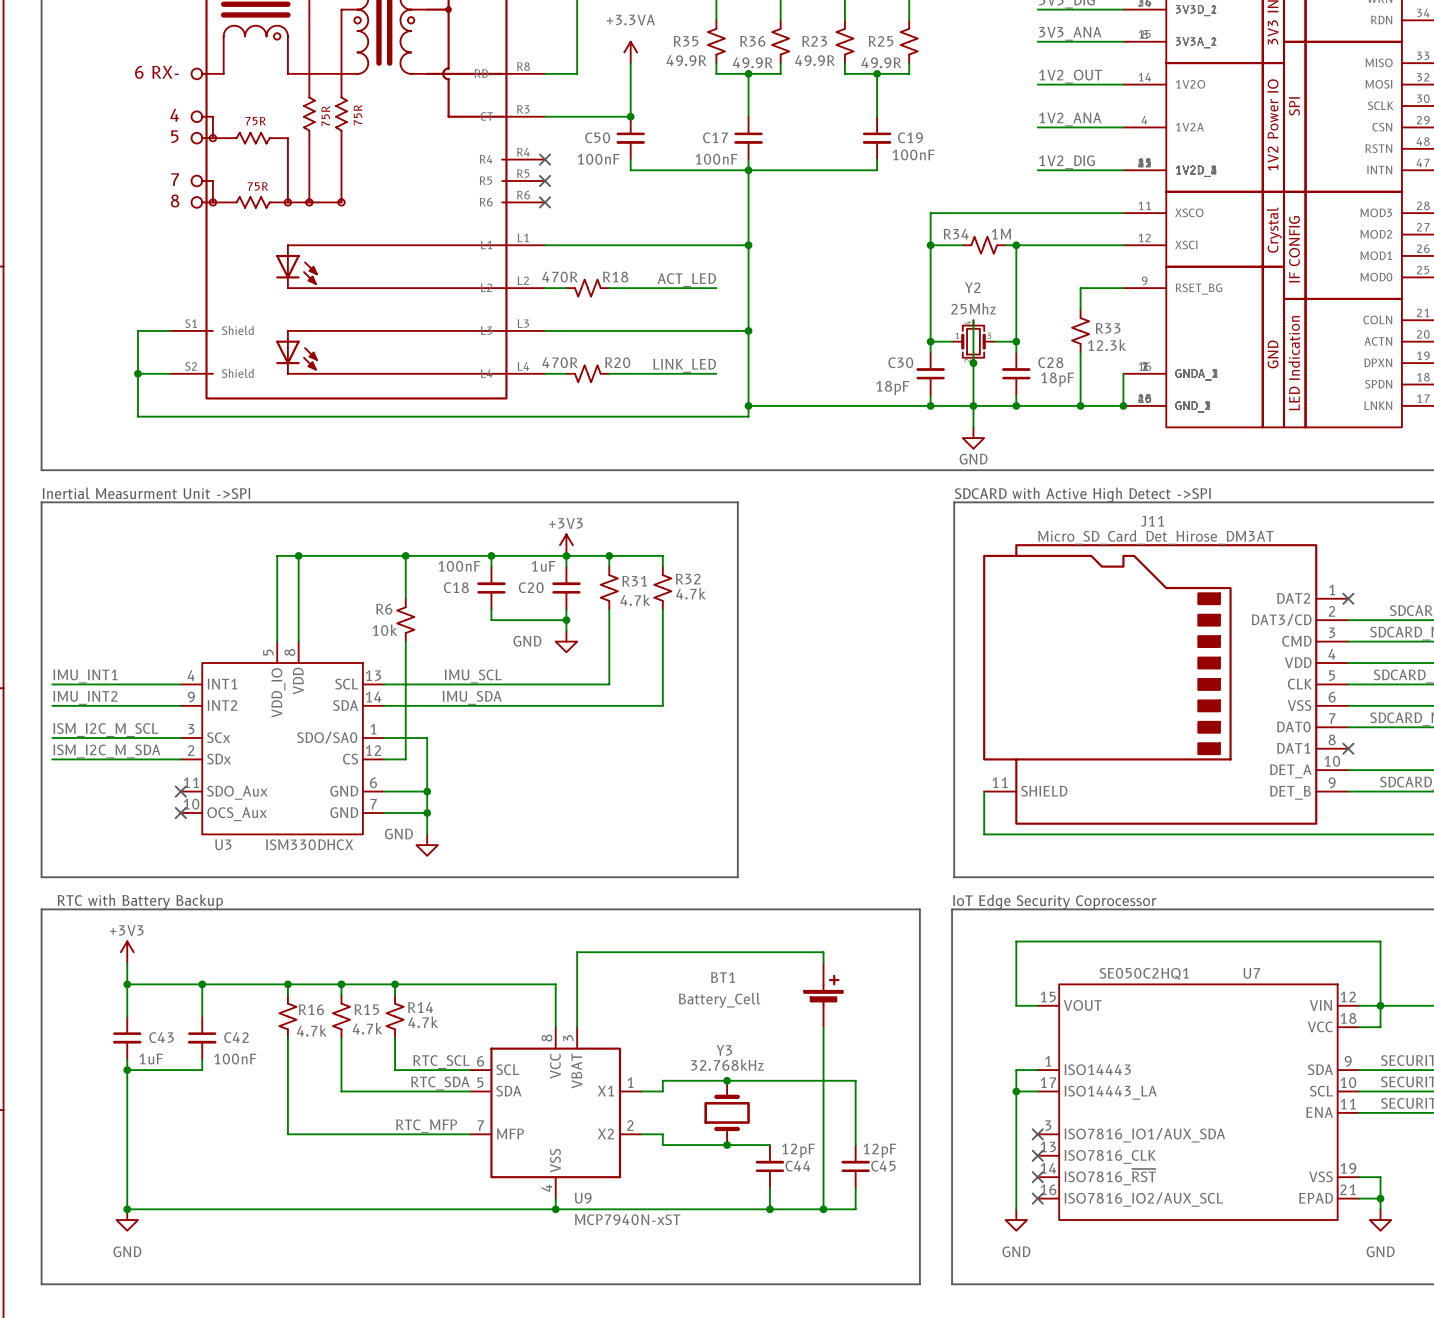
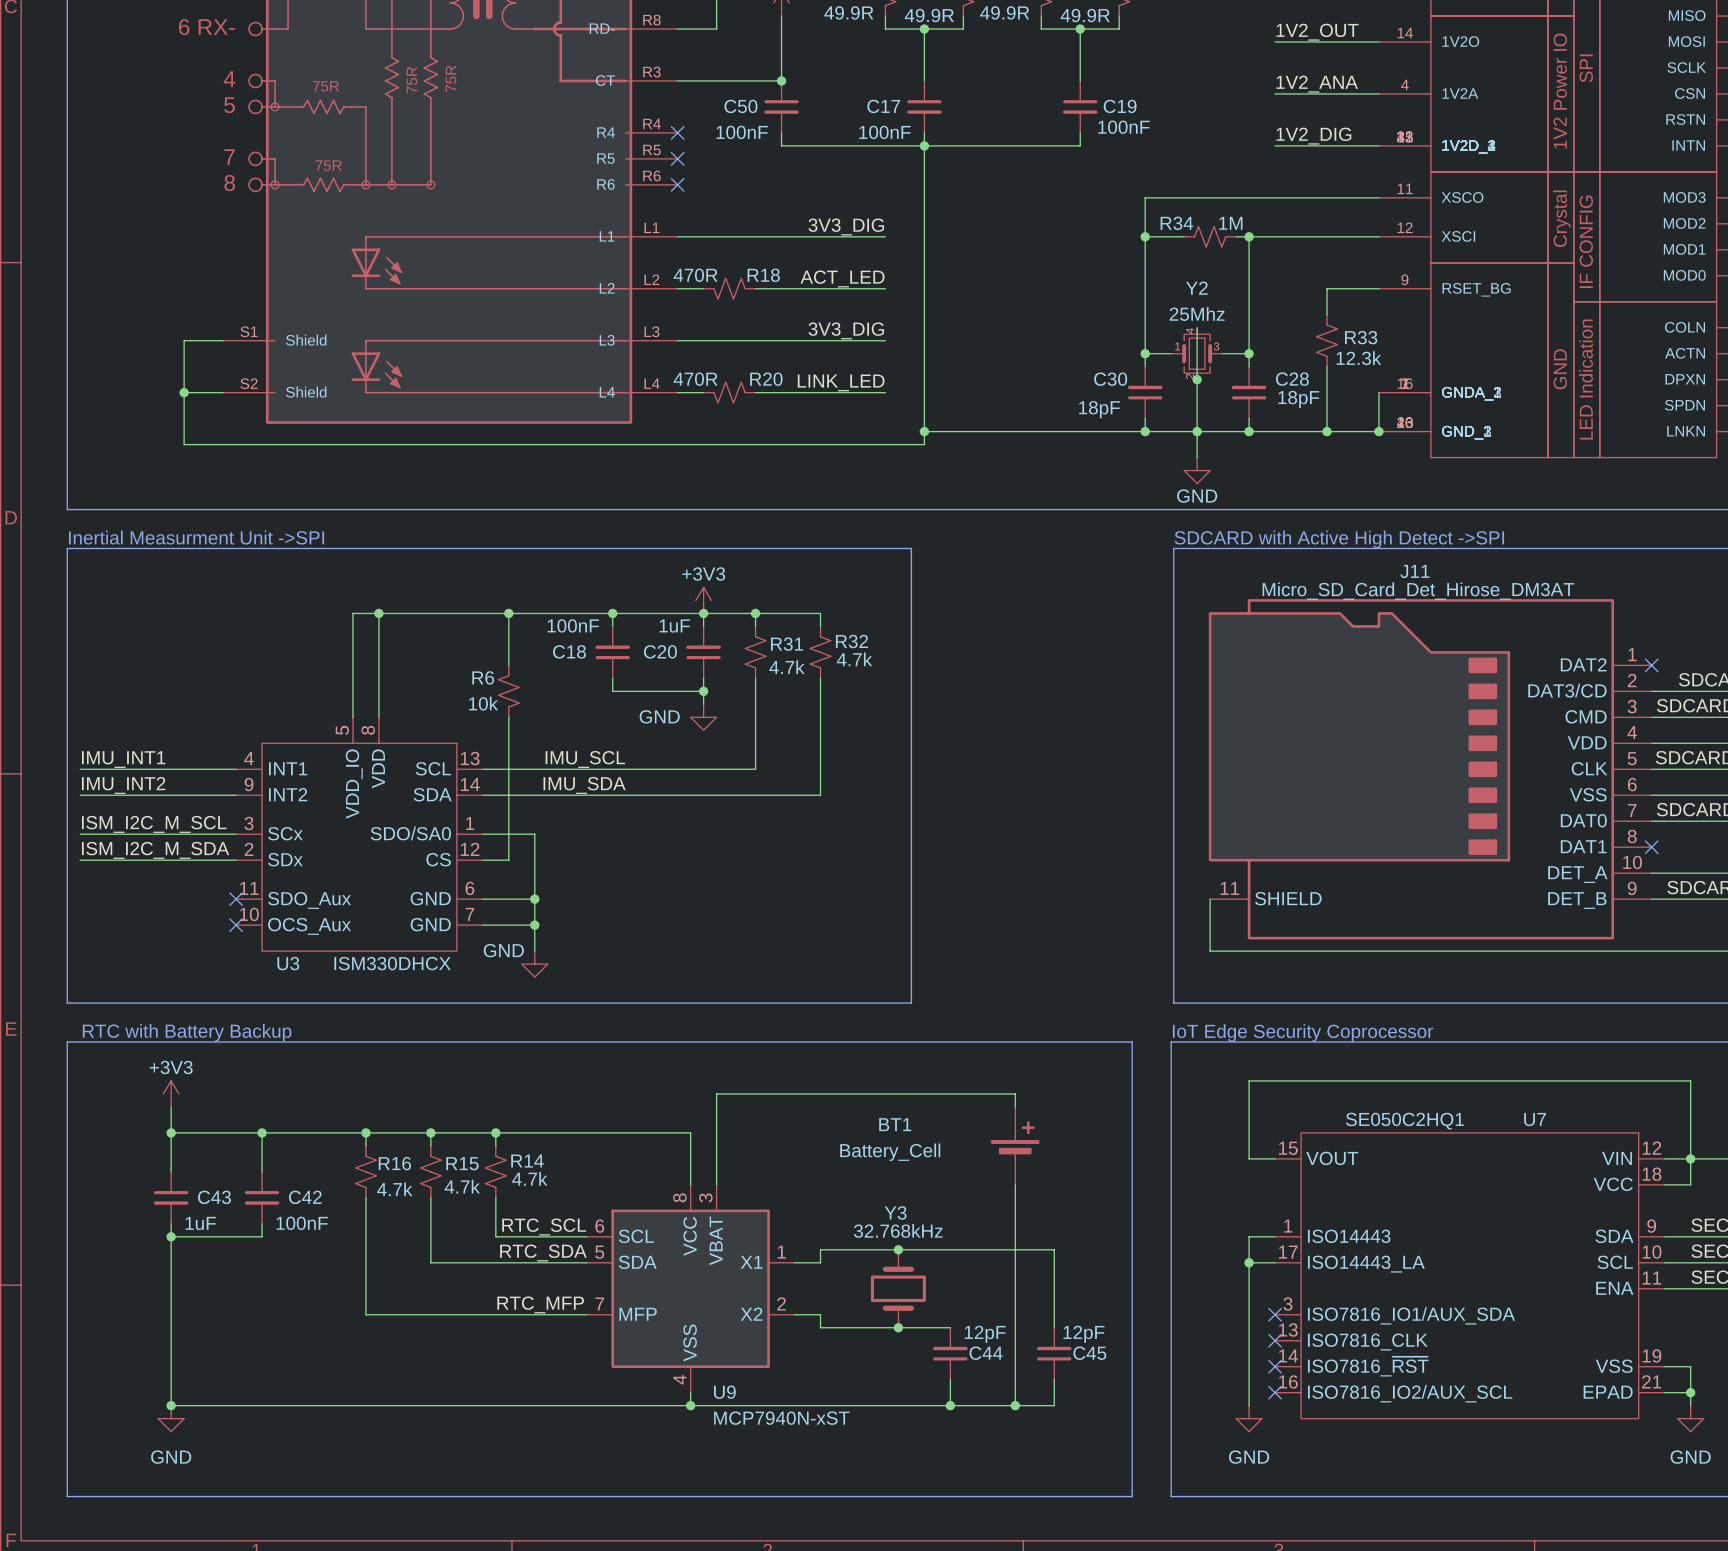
label: none -> 3V3_DIG (846, 227)
wire: (716, 245) (748, 245) -> none
junction: (748, 245) -> none
label: none -> 3V3_DIG (846, 330)
wire: (716, 330) (748, 330) -> none
junction: (748, 330) -> none

